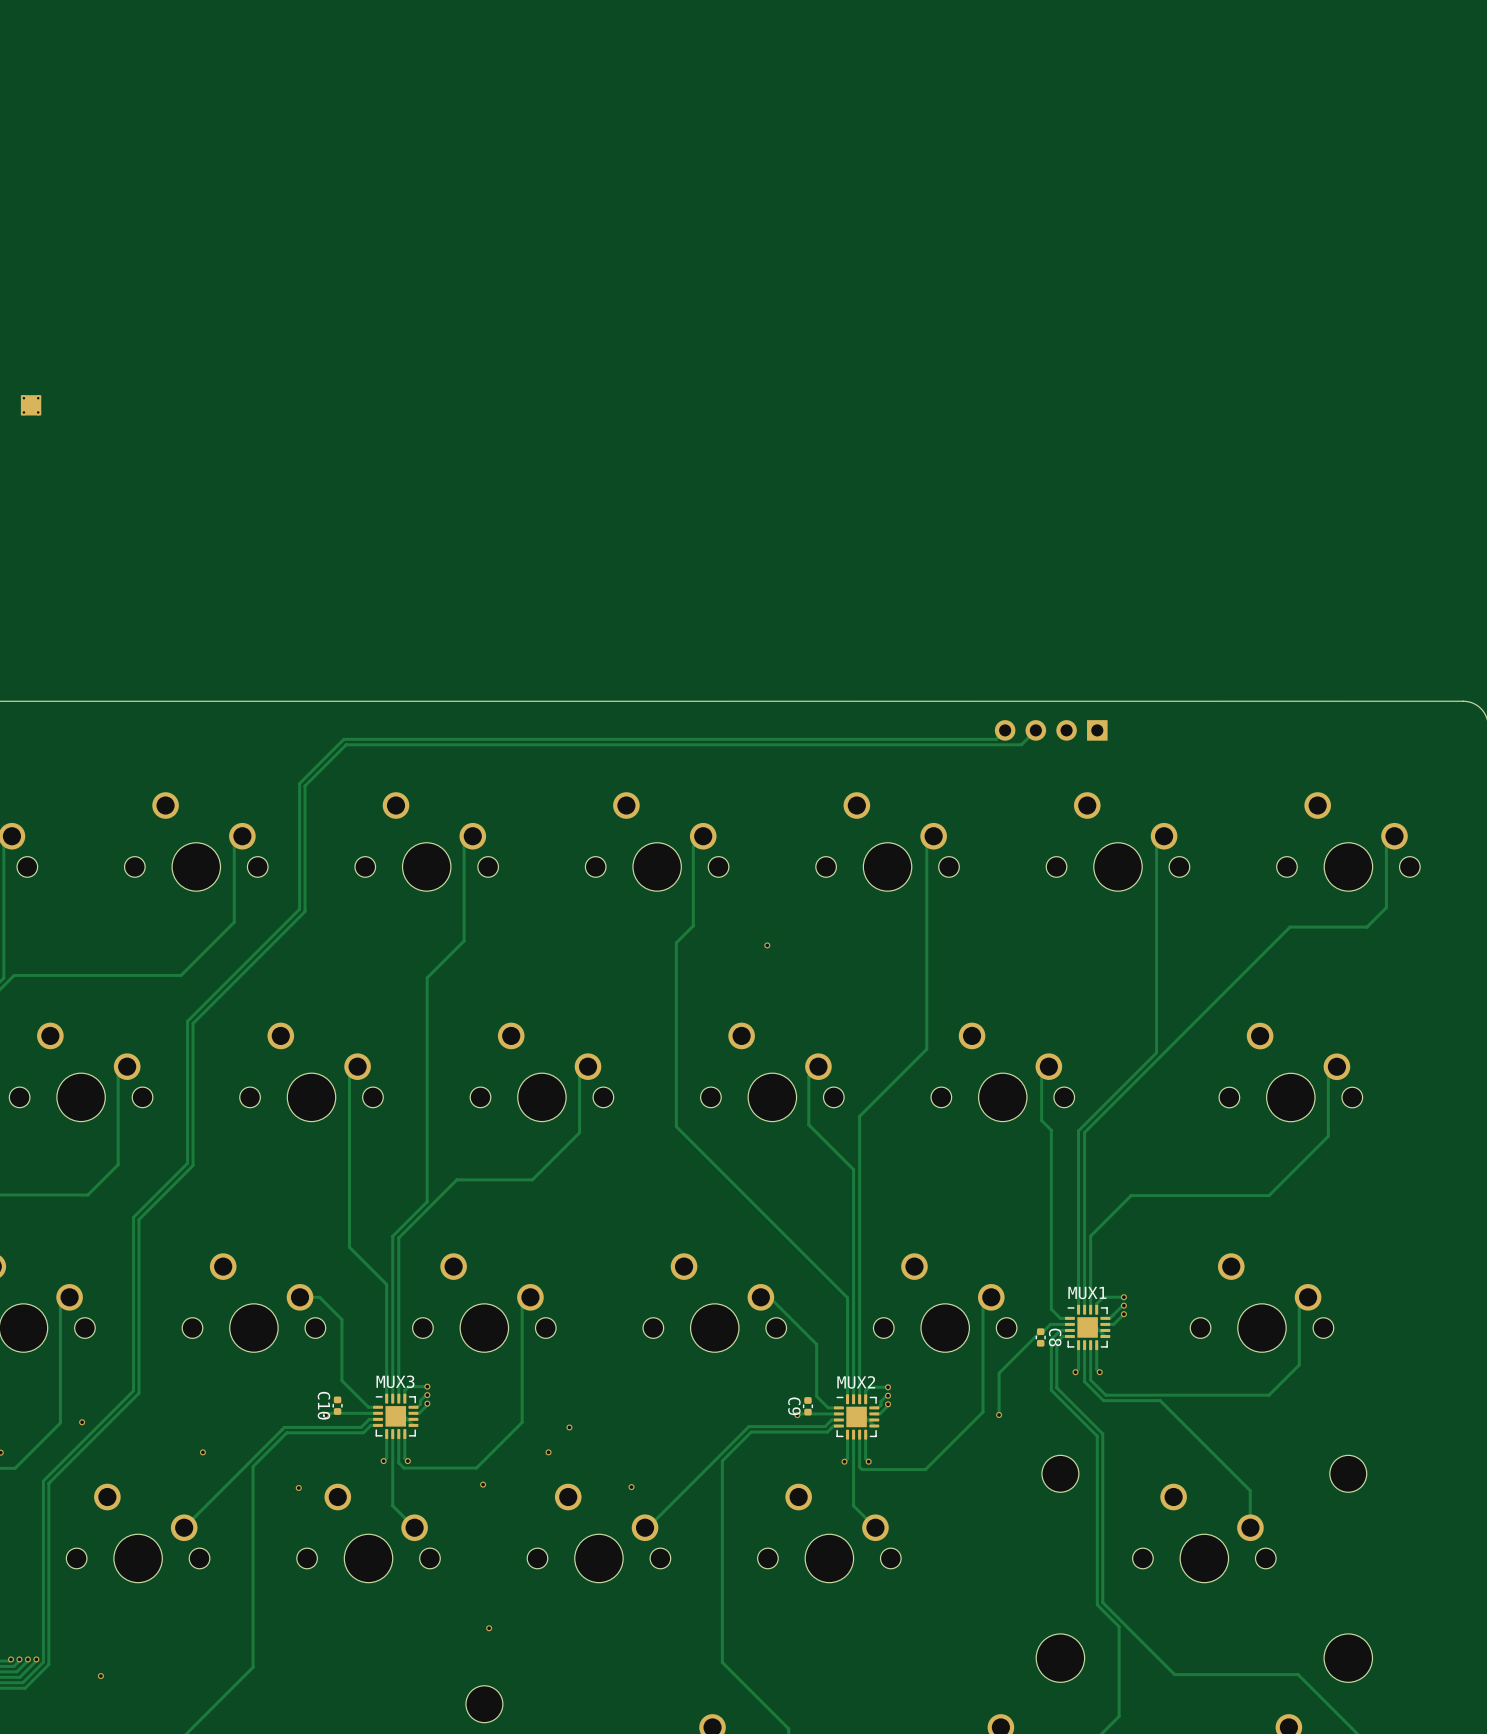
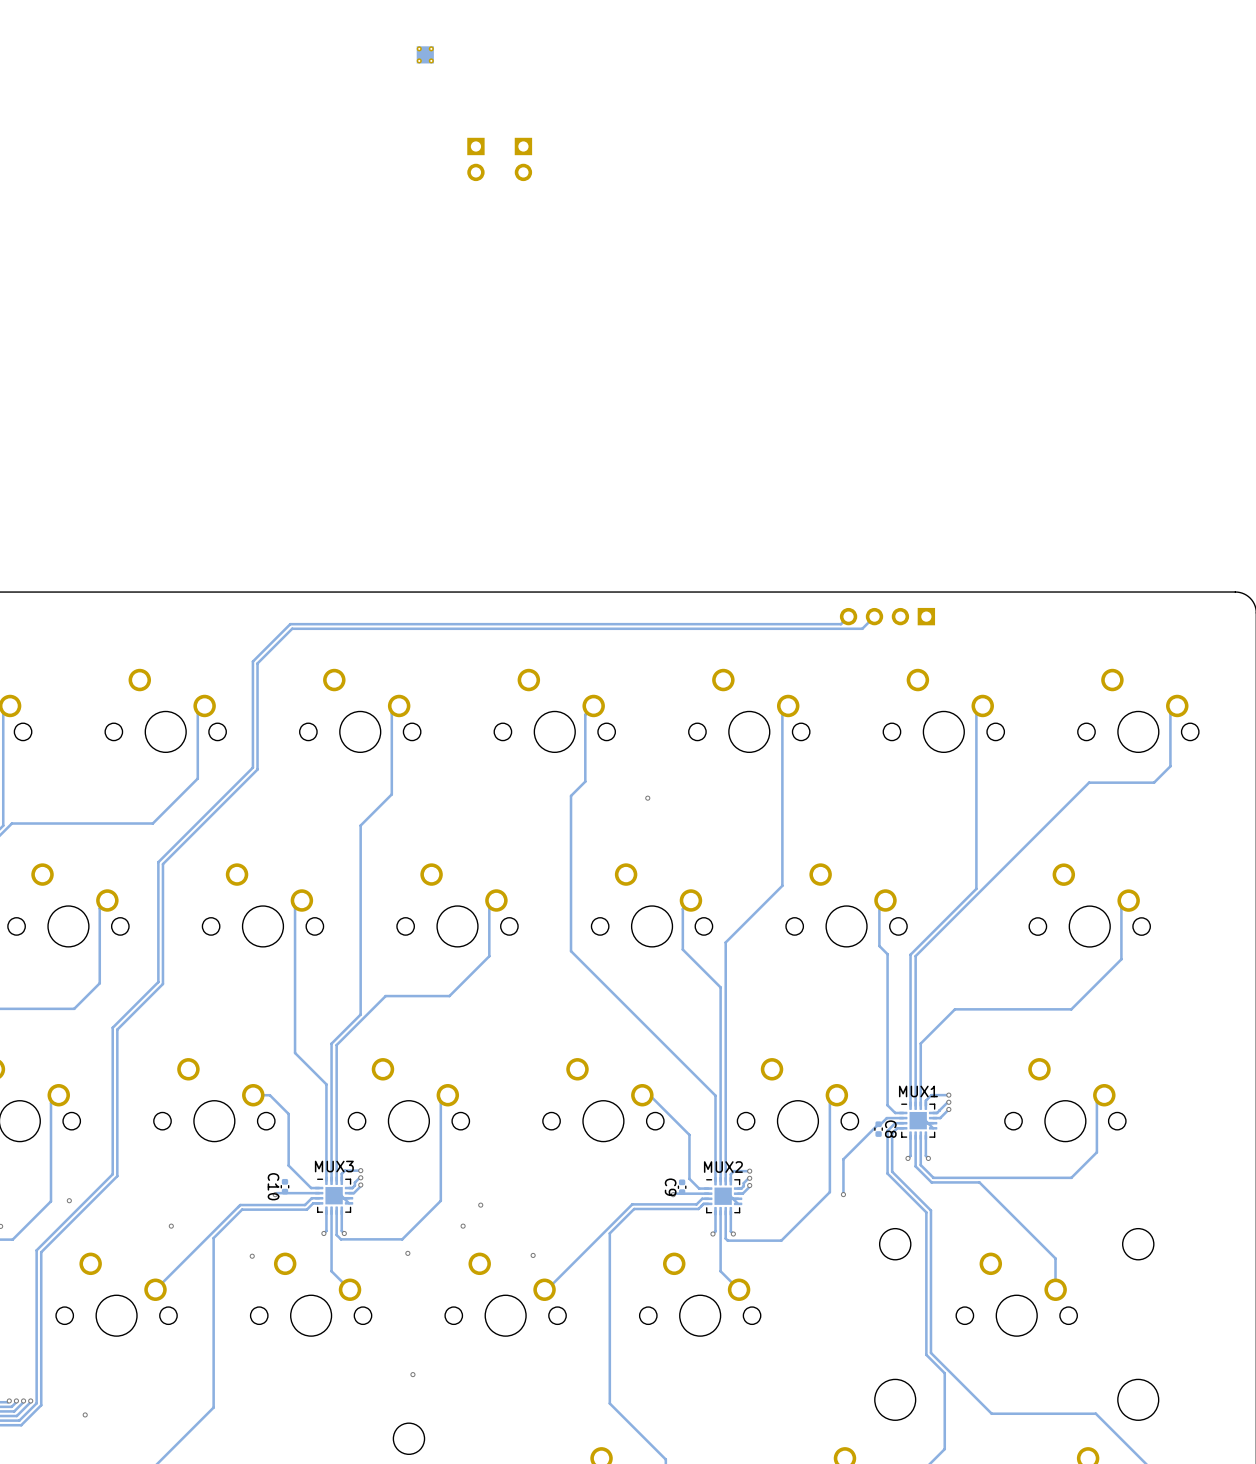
part: none -> (425, 54)
part: none -> (475, 159)
part: none -> (523, 159)
part: (31, 405) -> none

